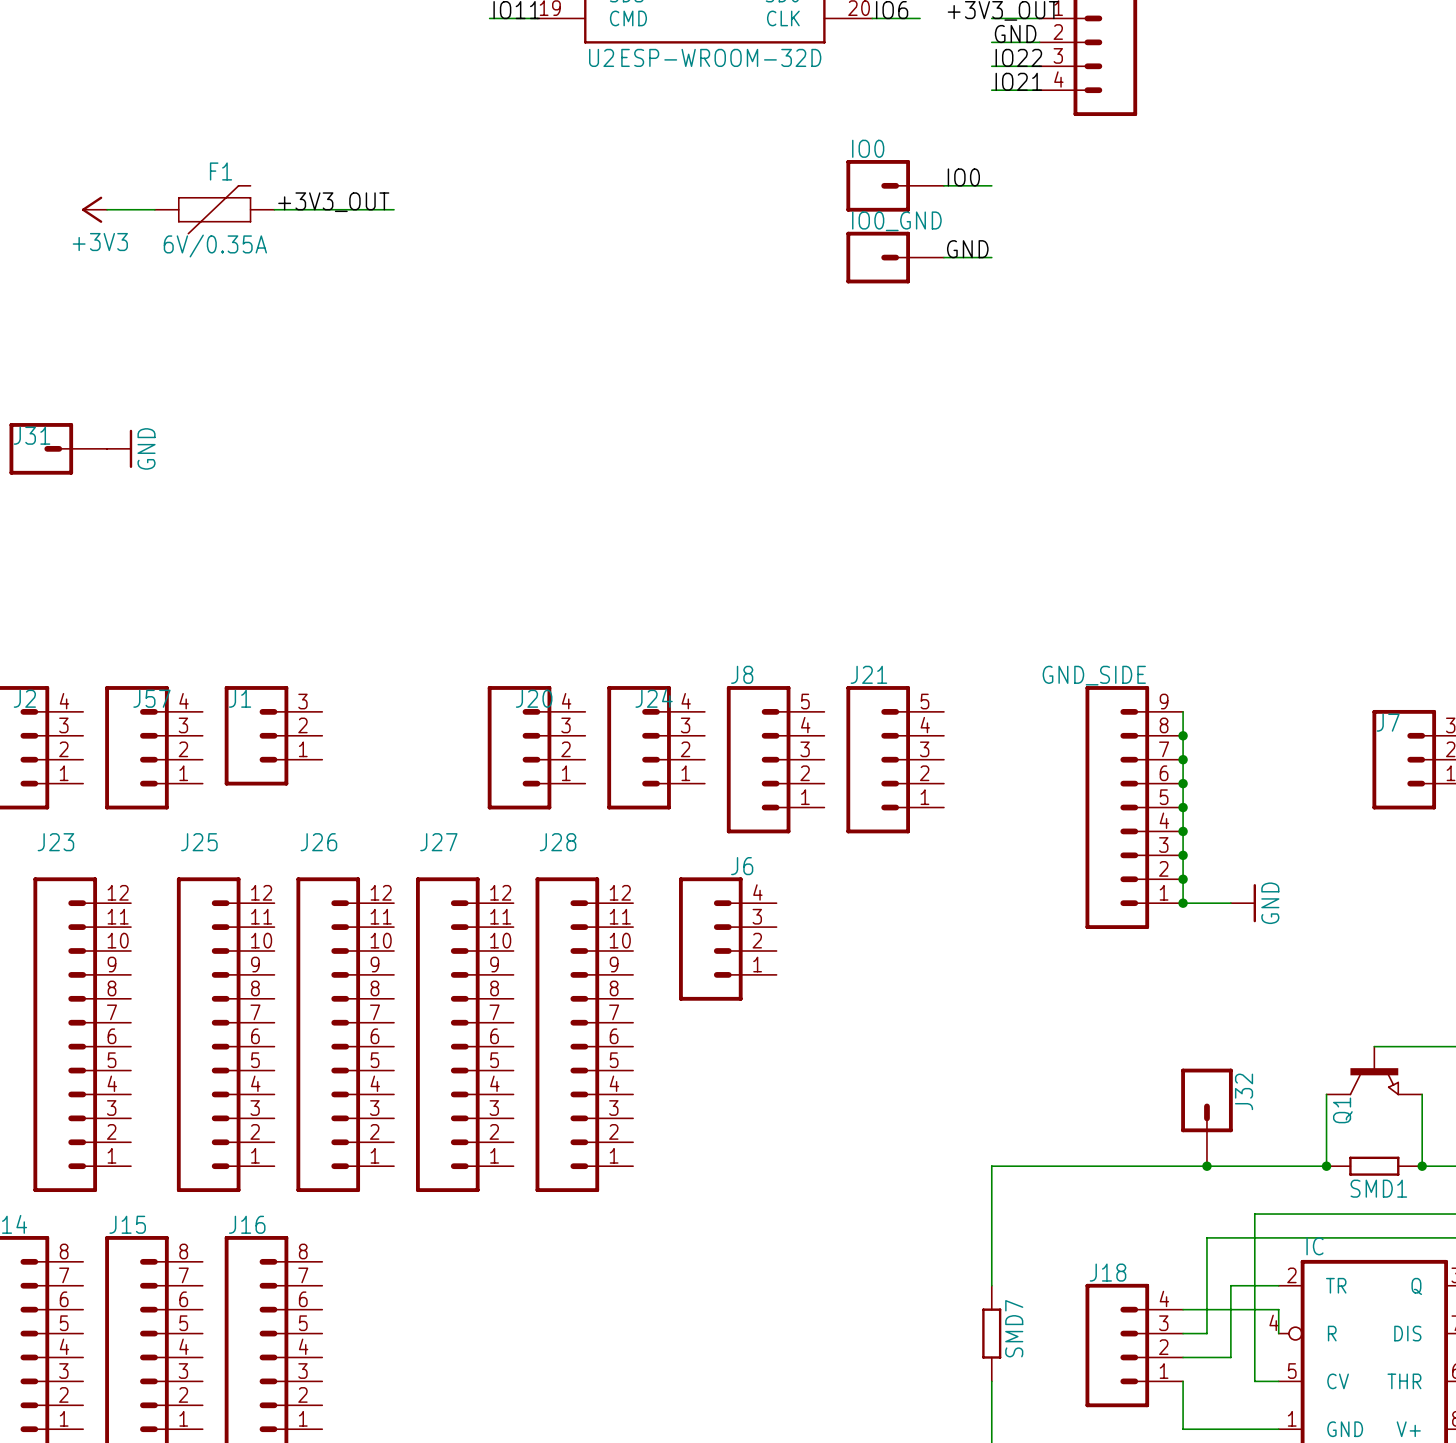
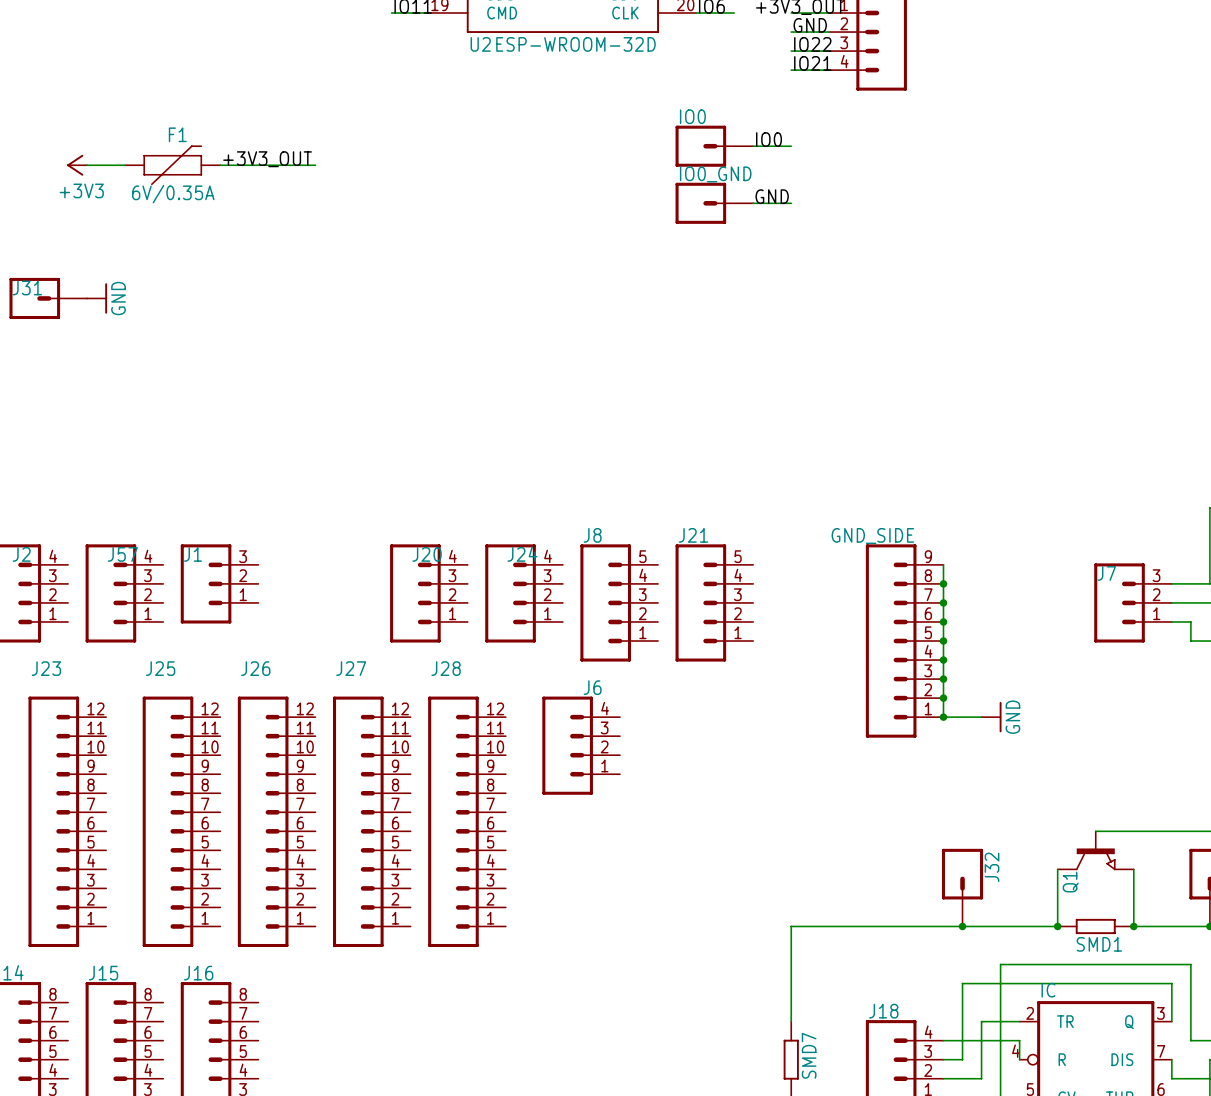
J31 position: (58, 448) -> (48, 298)
power symbol position: GND (119, 448) -> GND (97, 298)

